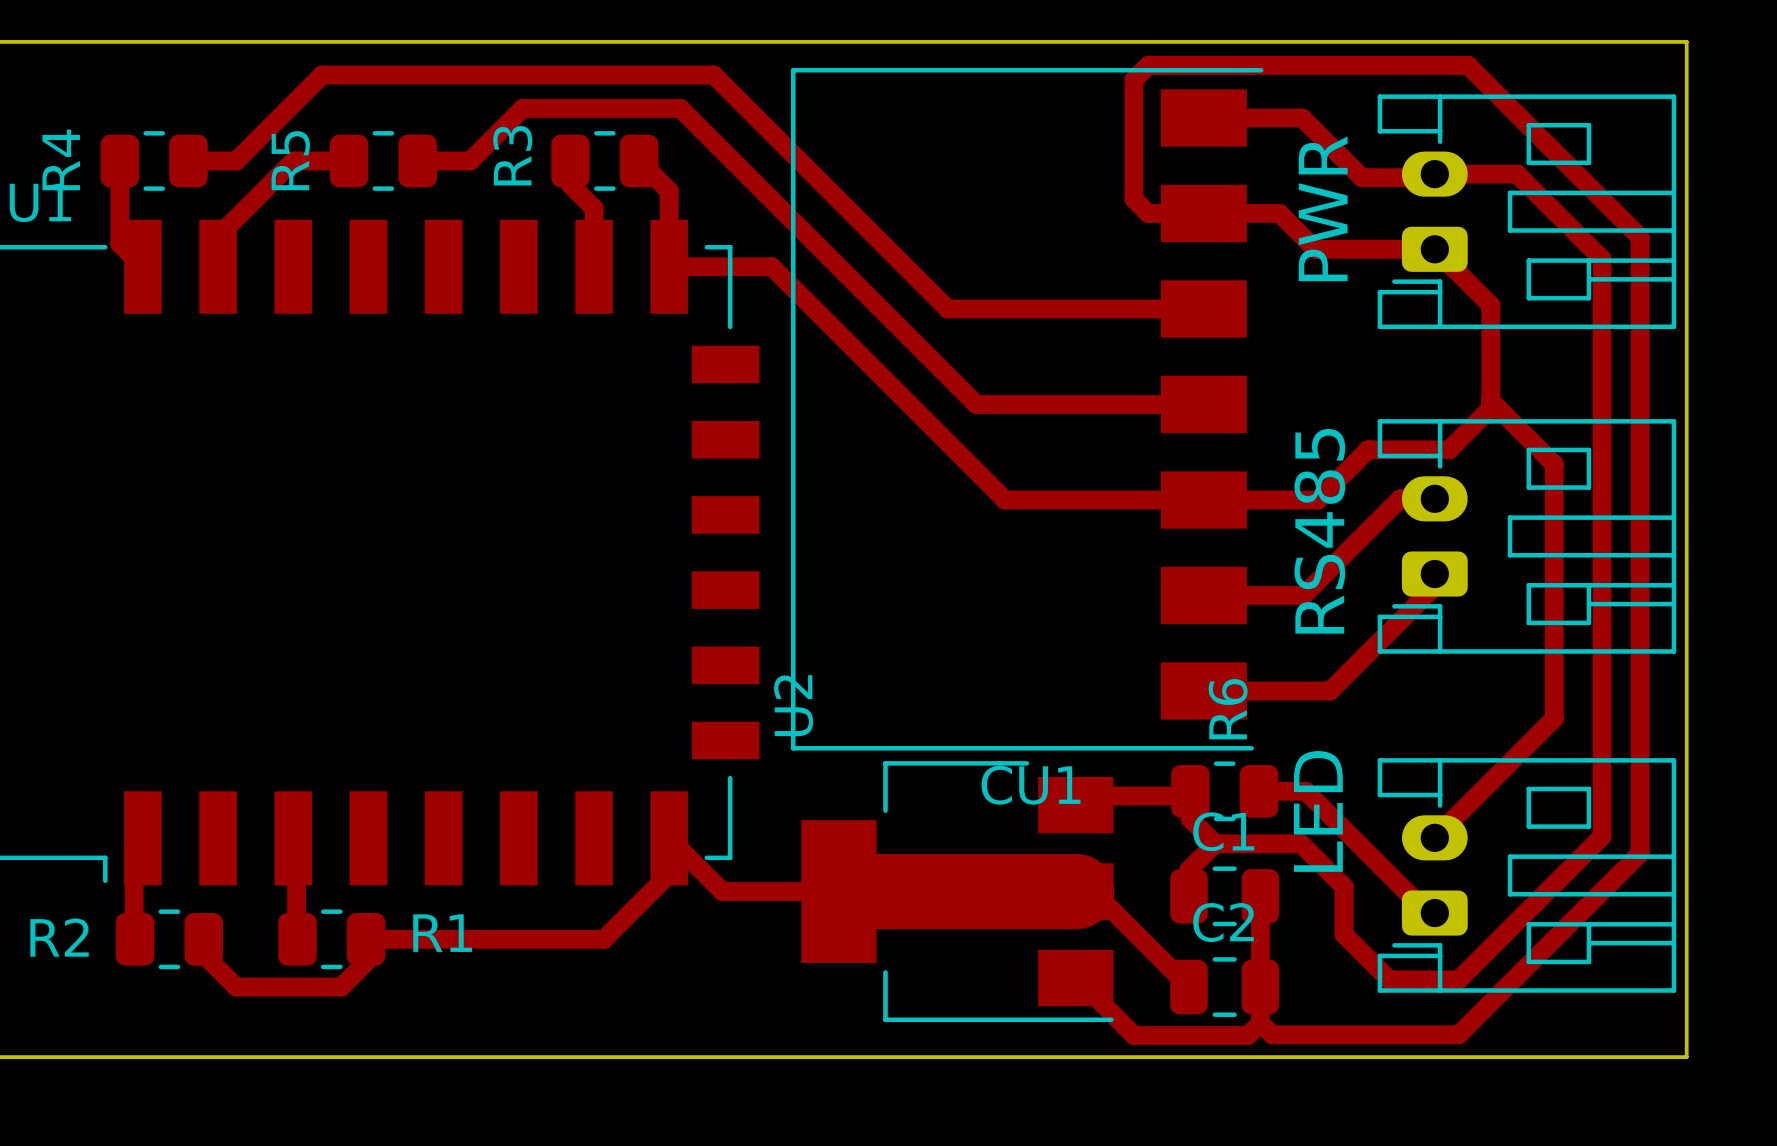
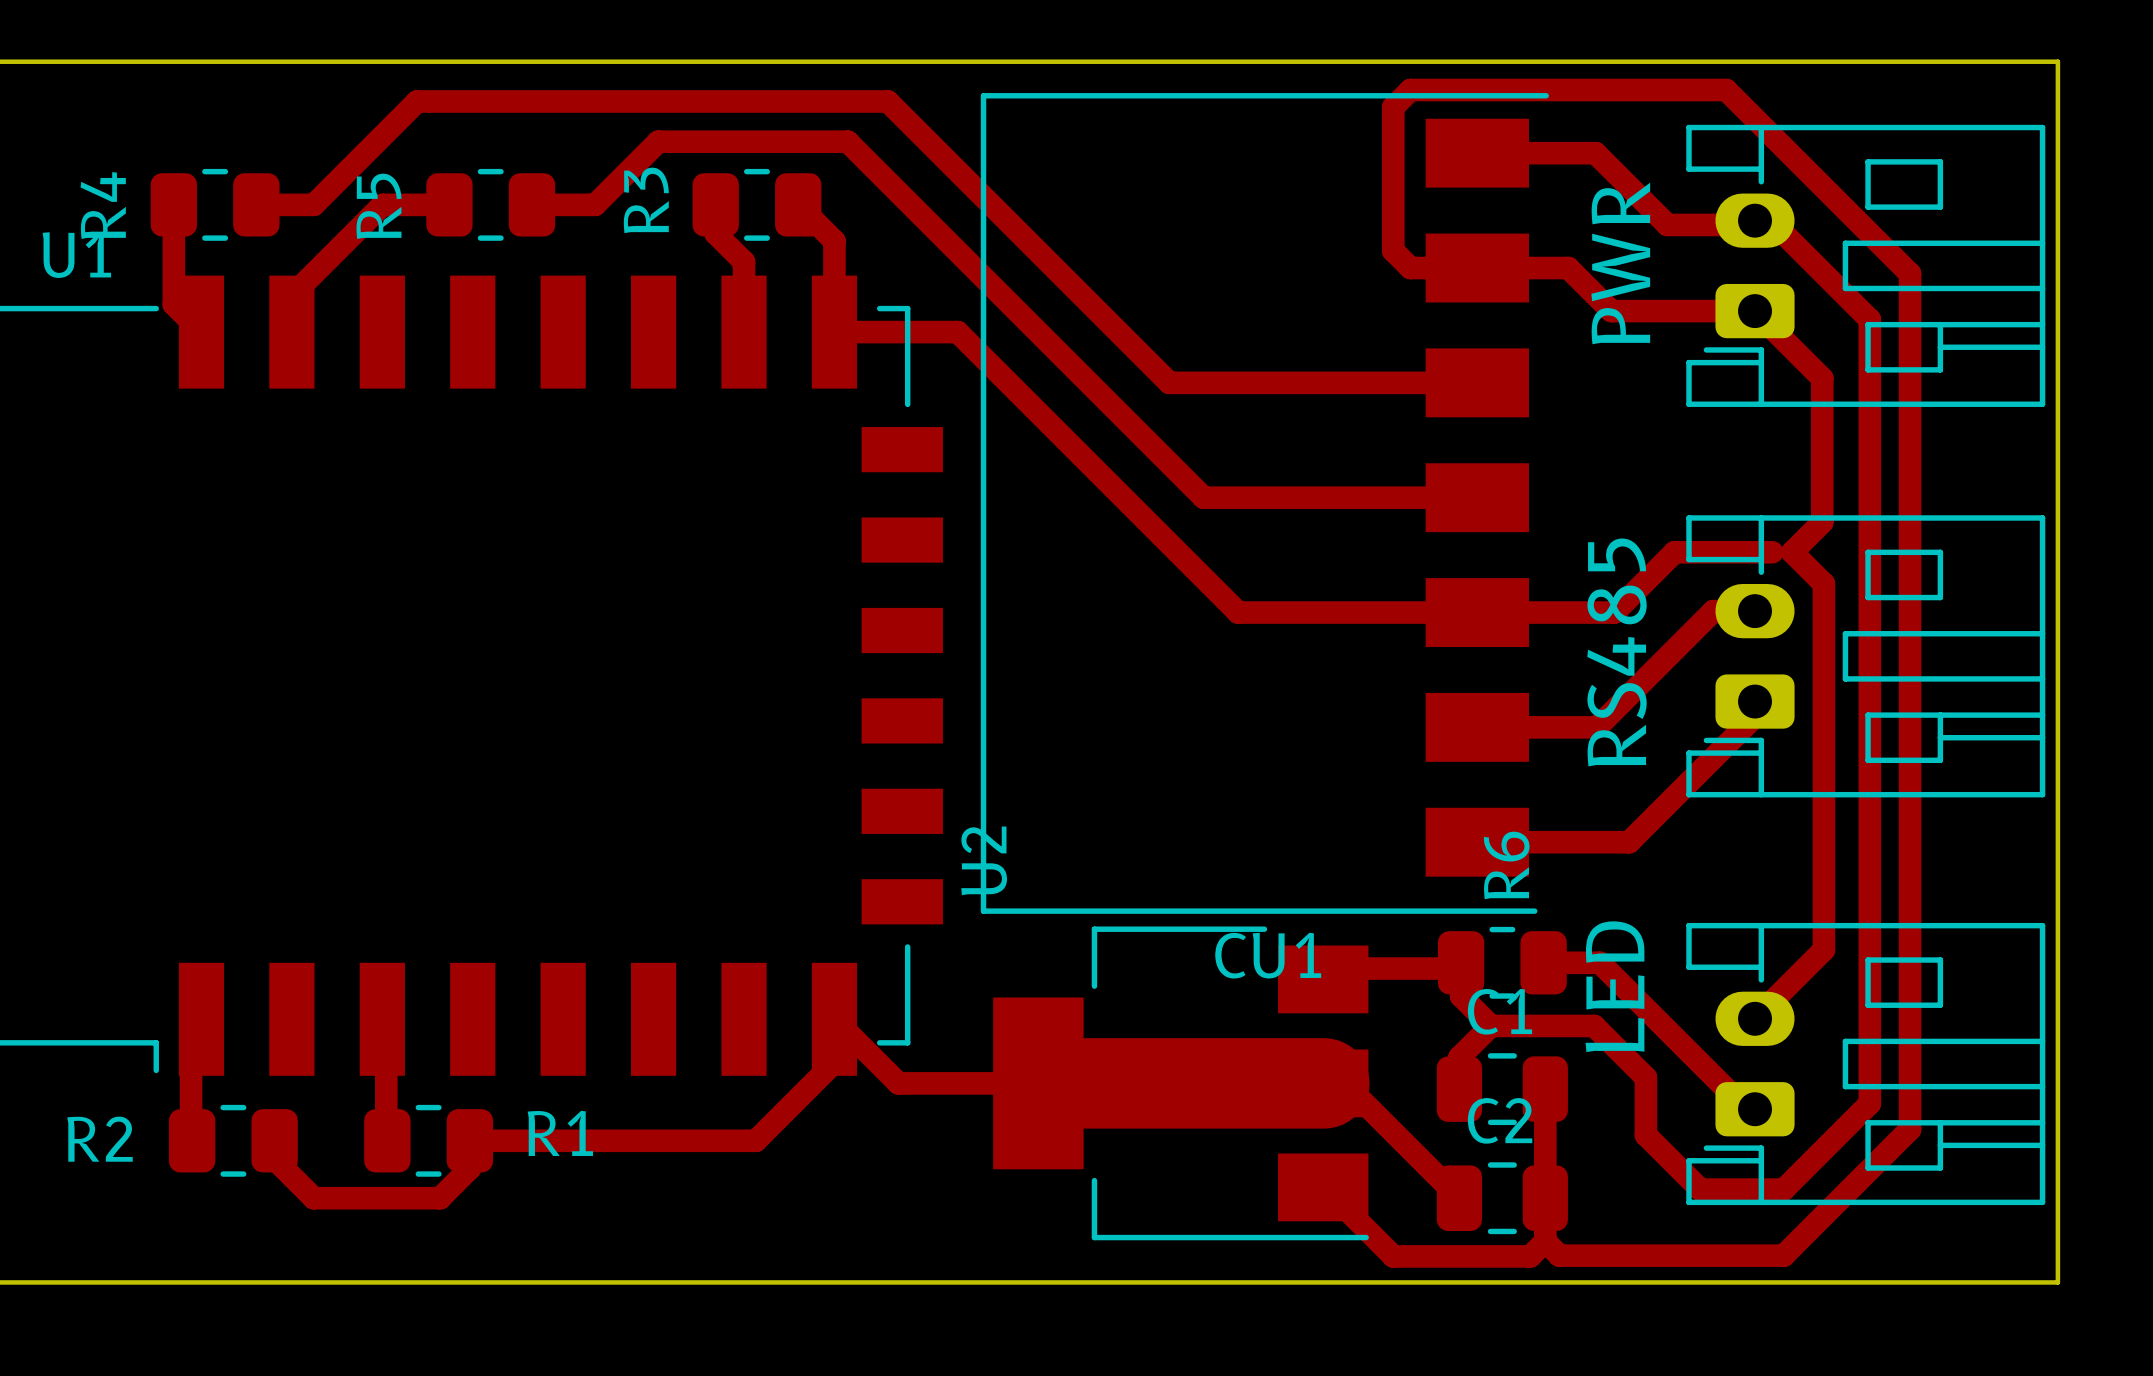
track: (1410, 65) (1468, 65) (1640, 237) (1640, 853) (1563, 929) -> (1726, 90) (1910, 273) (1910, 1129)
track: (1447, 174) (1517, 174) (1601, 258) (1601, 836) (1530, 908) -> (1770, 220) (1869, 319) (1869, 1103)
track: (1490, 400) (1554, 464) (1554, 718) (1492, 780) -> (1822, 502) (1822, 522) (1792, 552) (1823, 583) (1823, 949)
track: (1490, 408) (1449, 449) -> none

